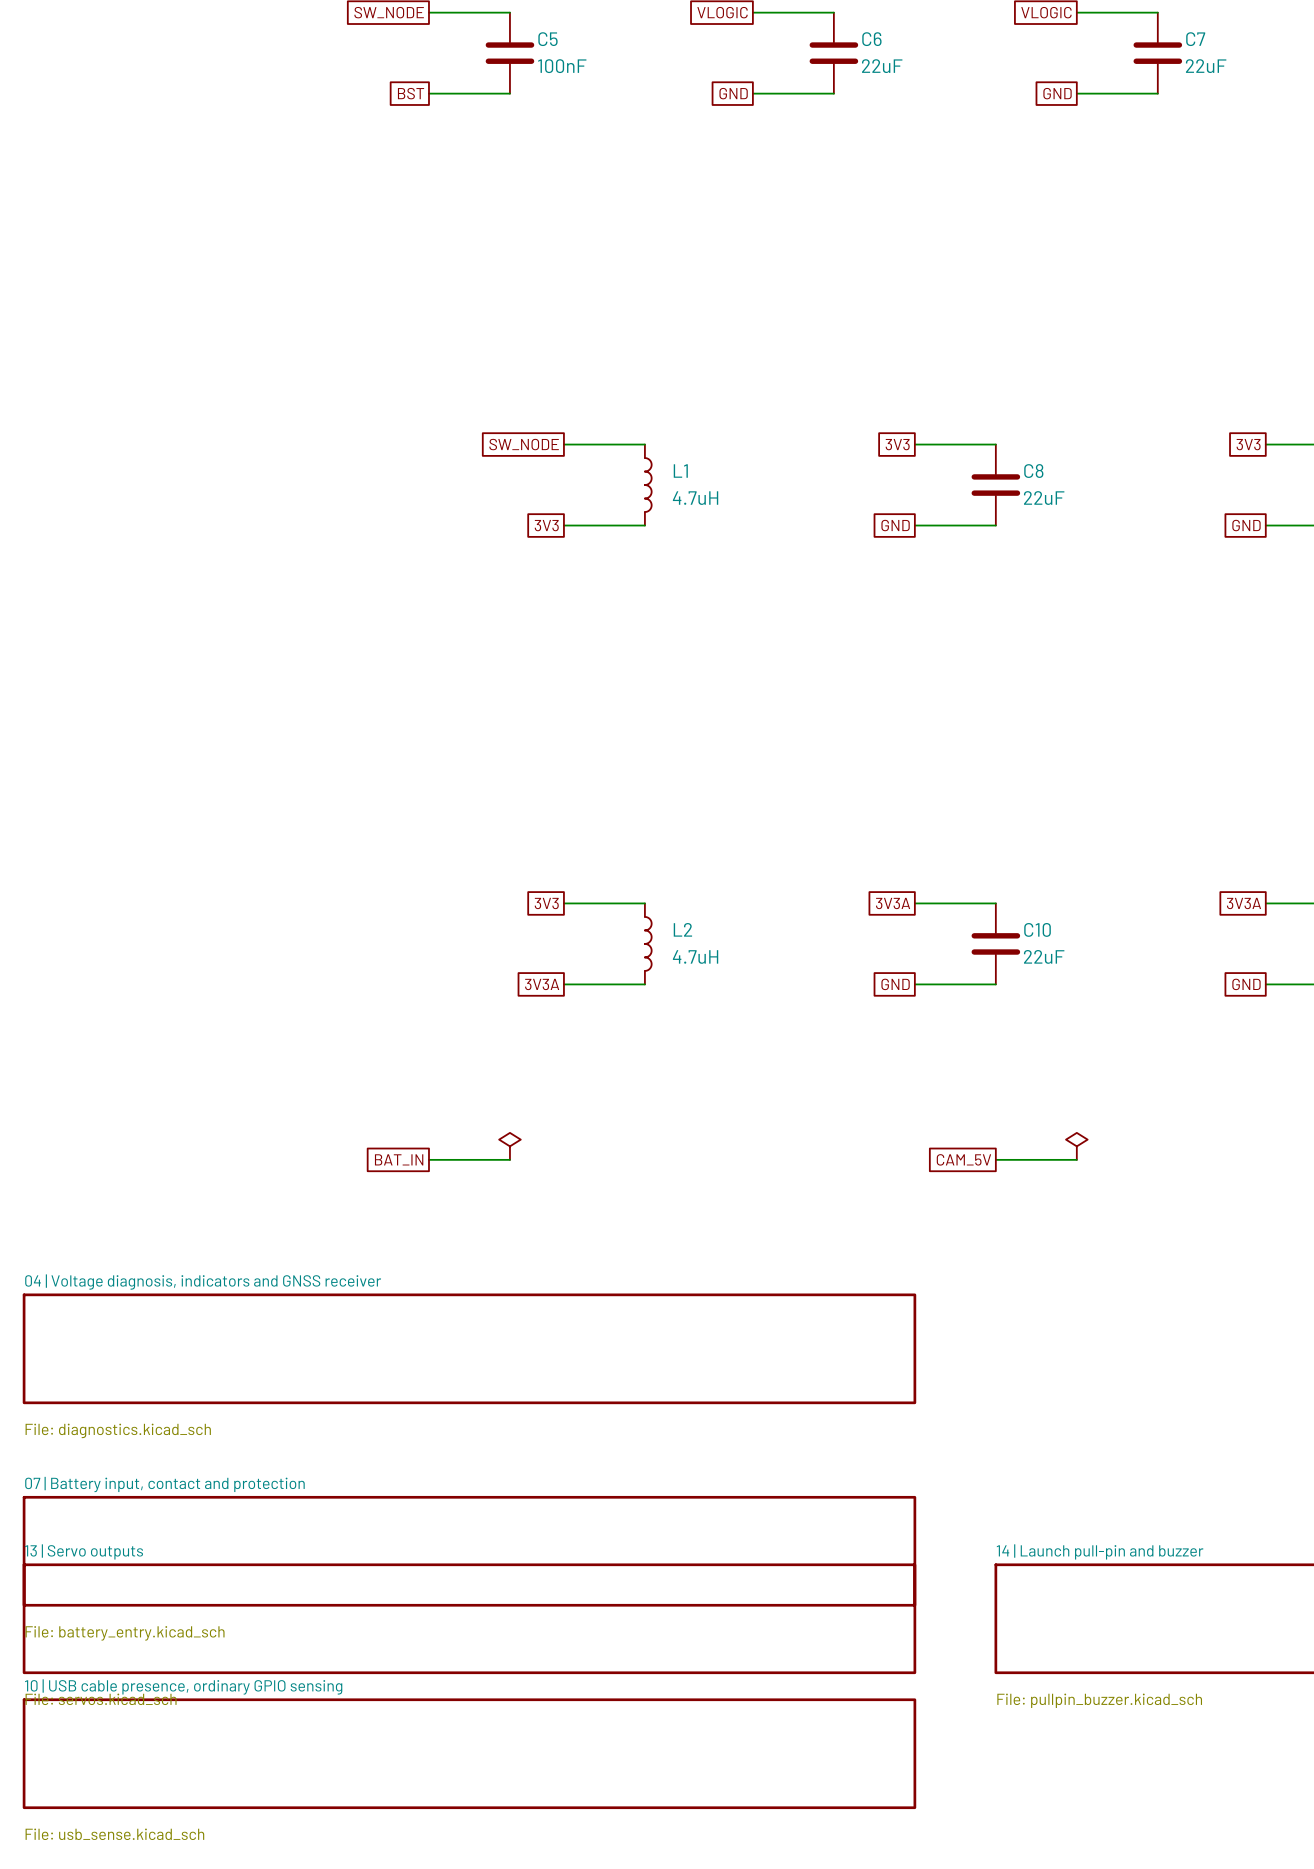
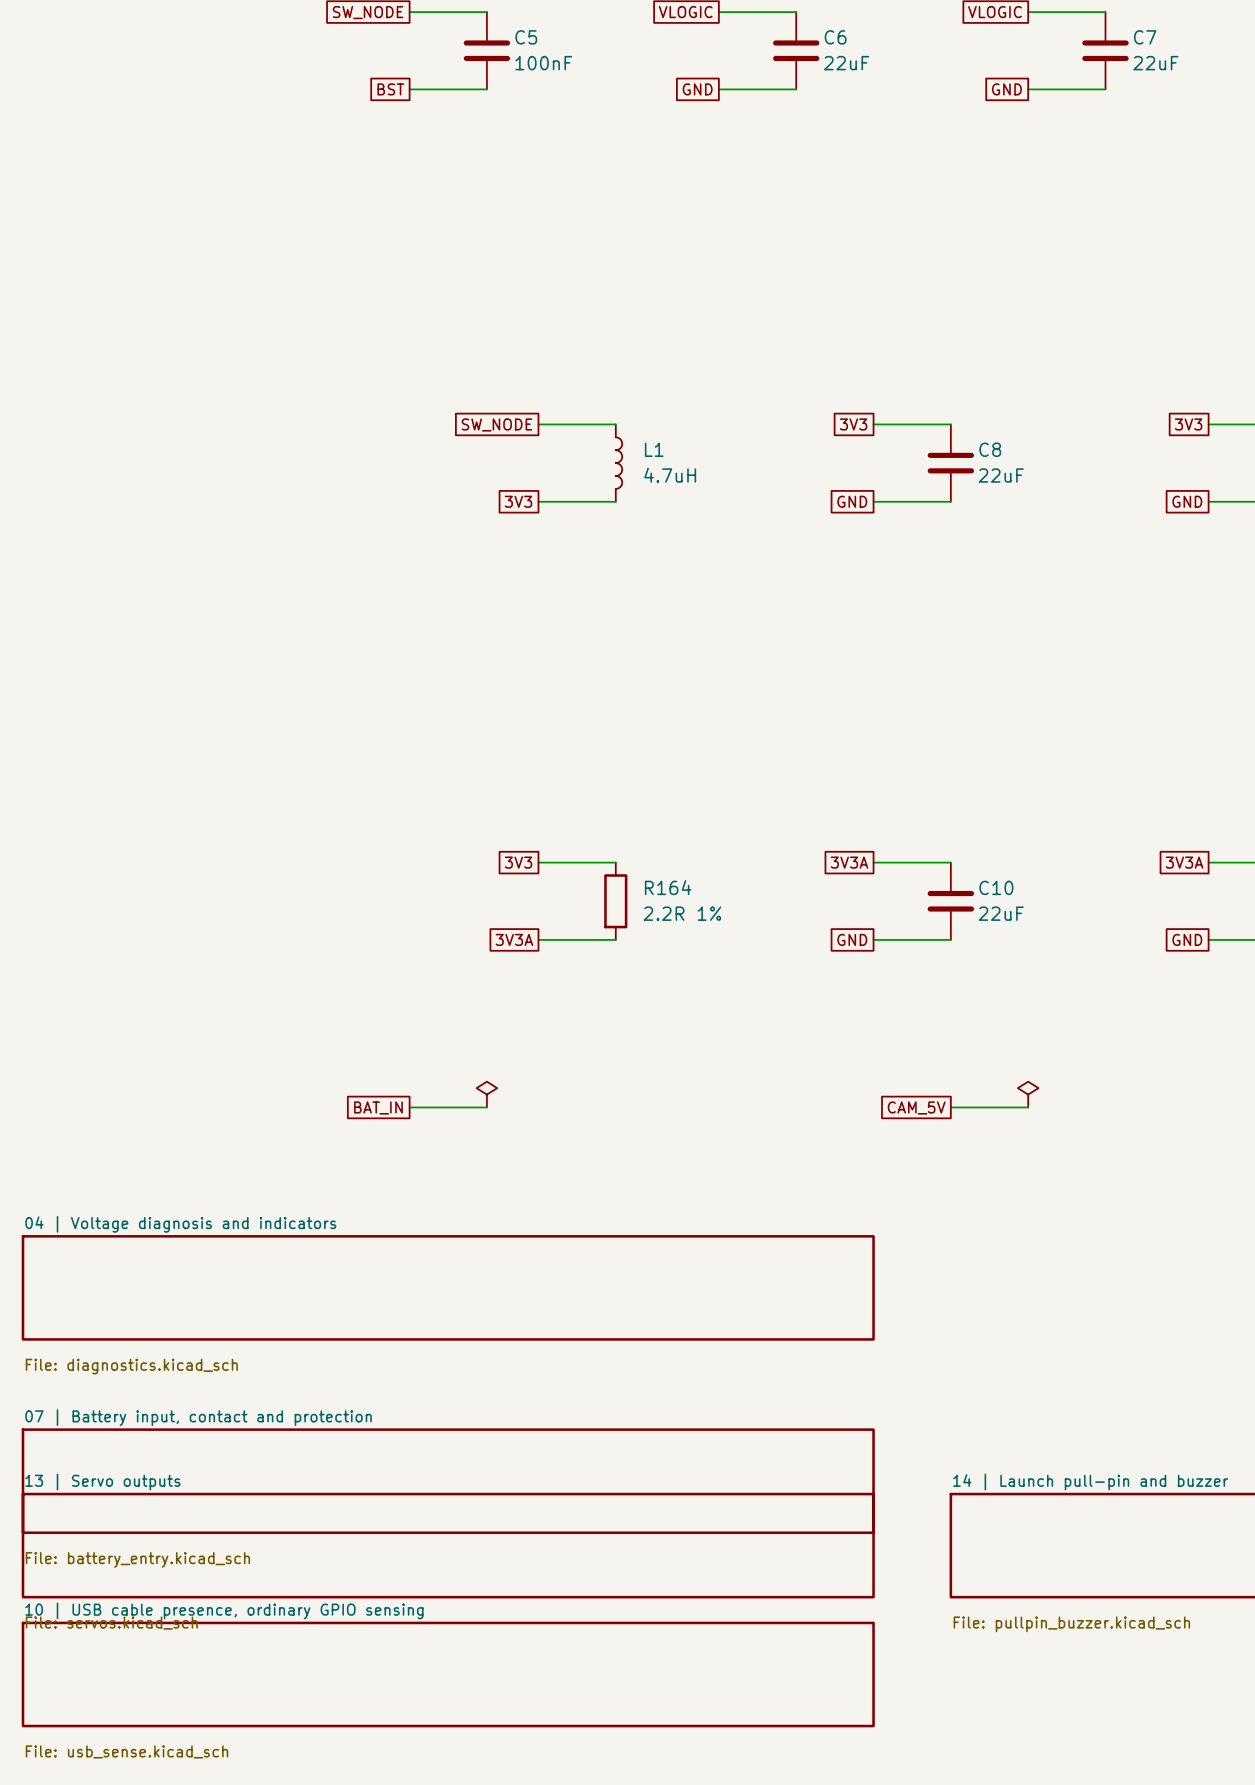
R164: none -> 2.2R 1% (615, 901)
L2: 4.7uH (648, 943) -> none
sheet 04 | Voltage diagnosis, indicators and GNSS receiver name: 04 | Voltage diagnosis, indicators and GNSS receiver (203, 1282) -> 04 | Voltage diagnosis and indicators (180, 1224)

